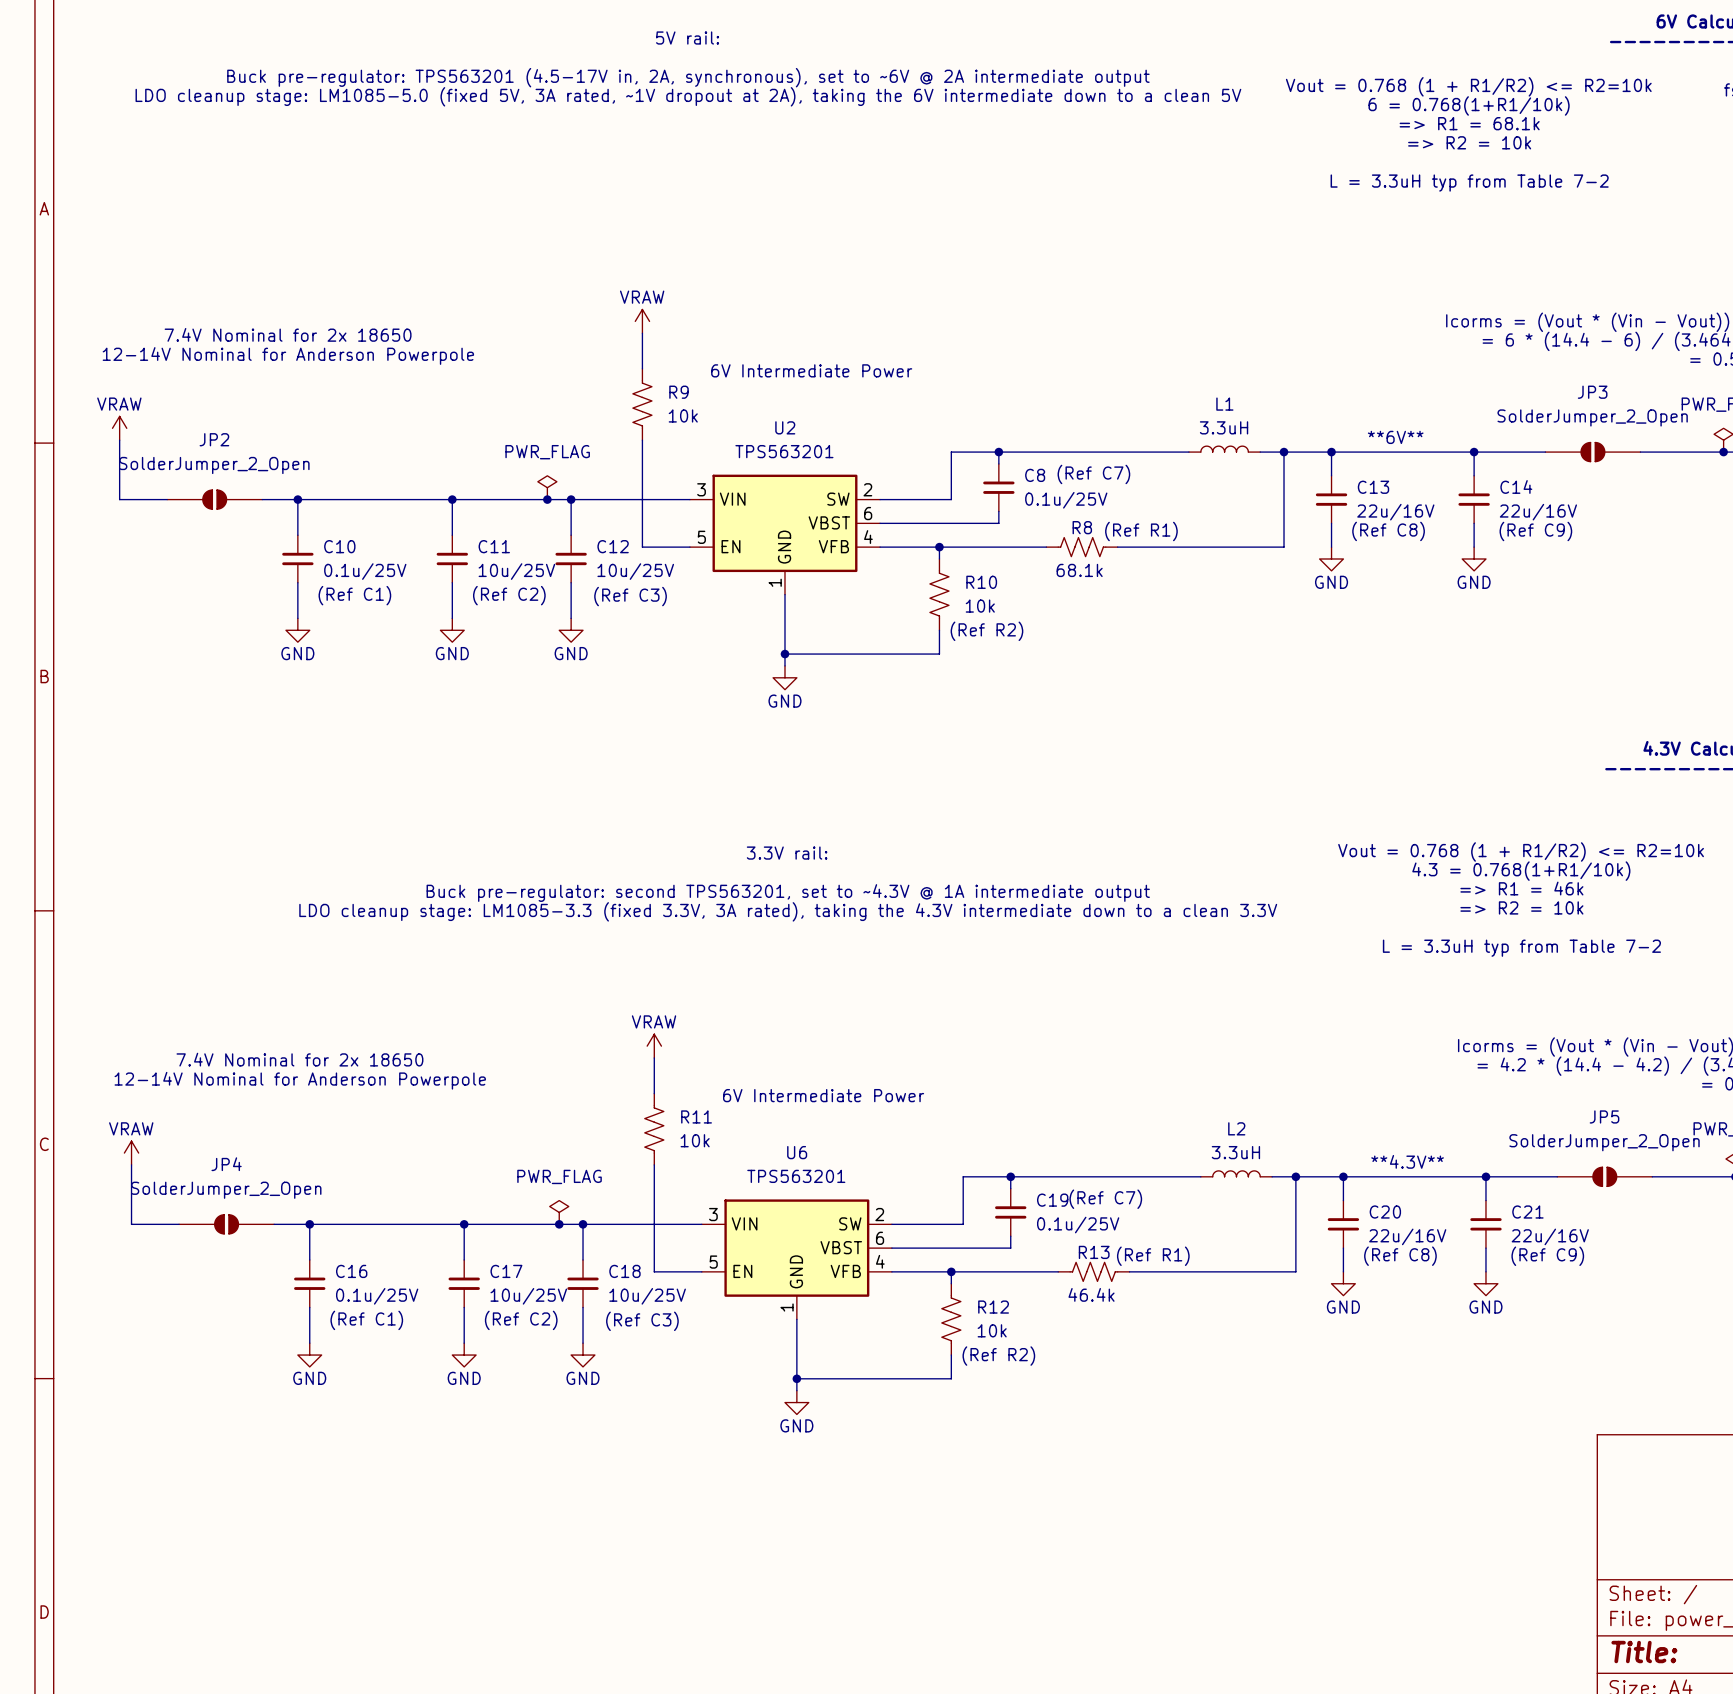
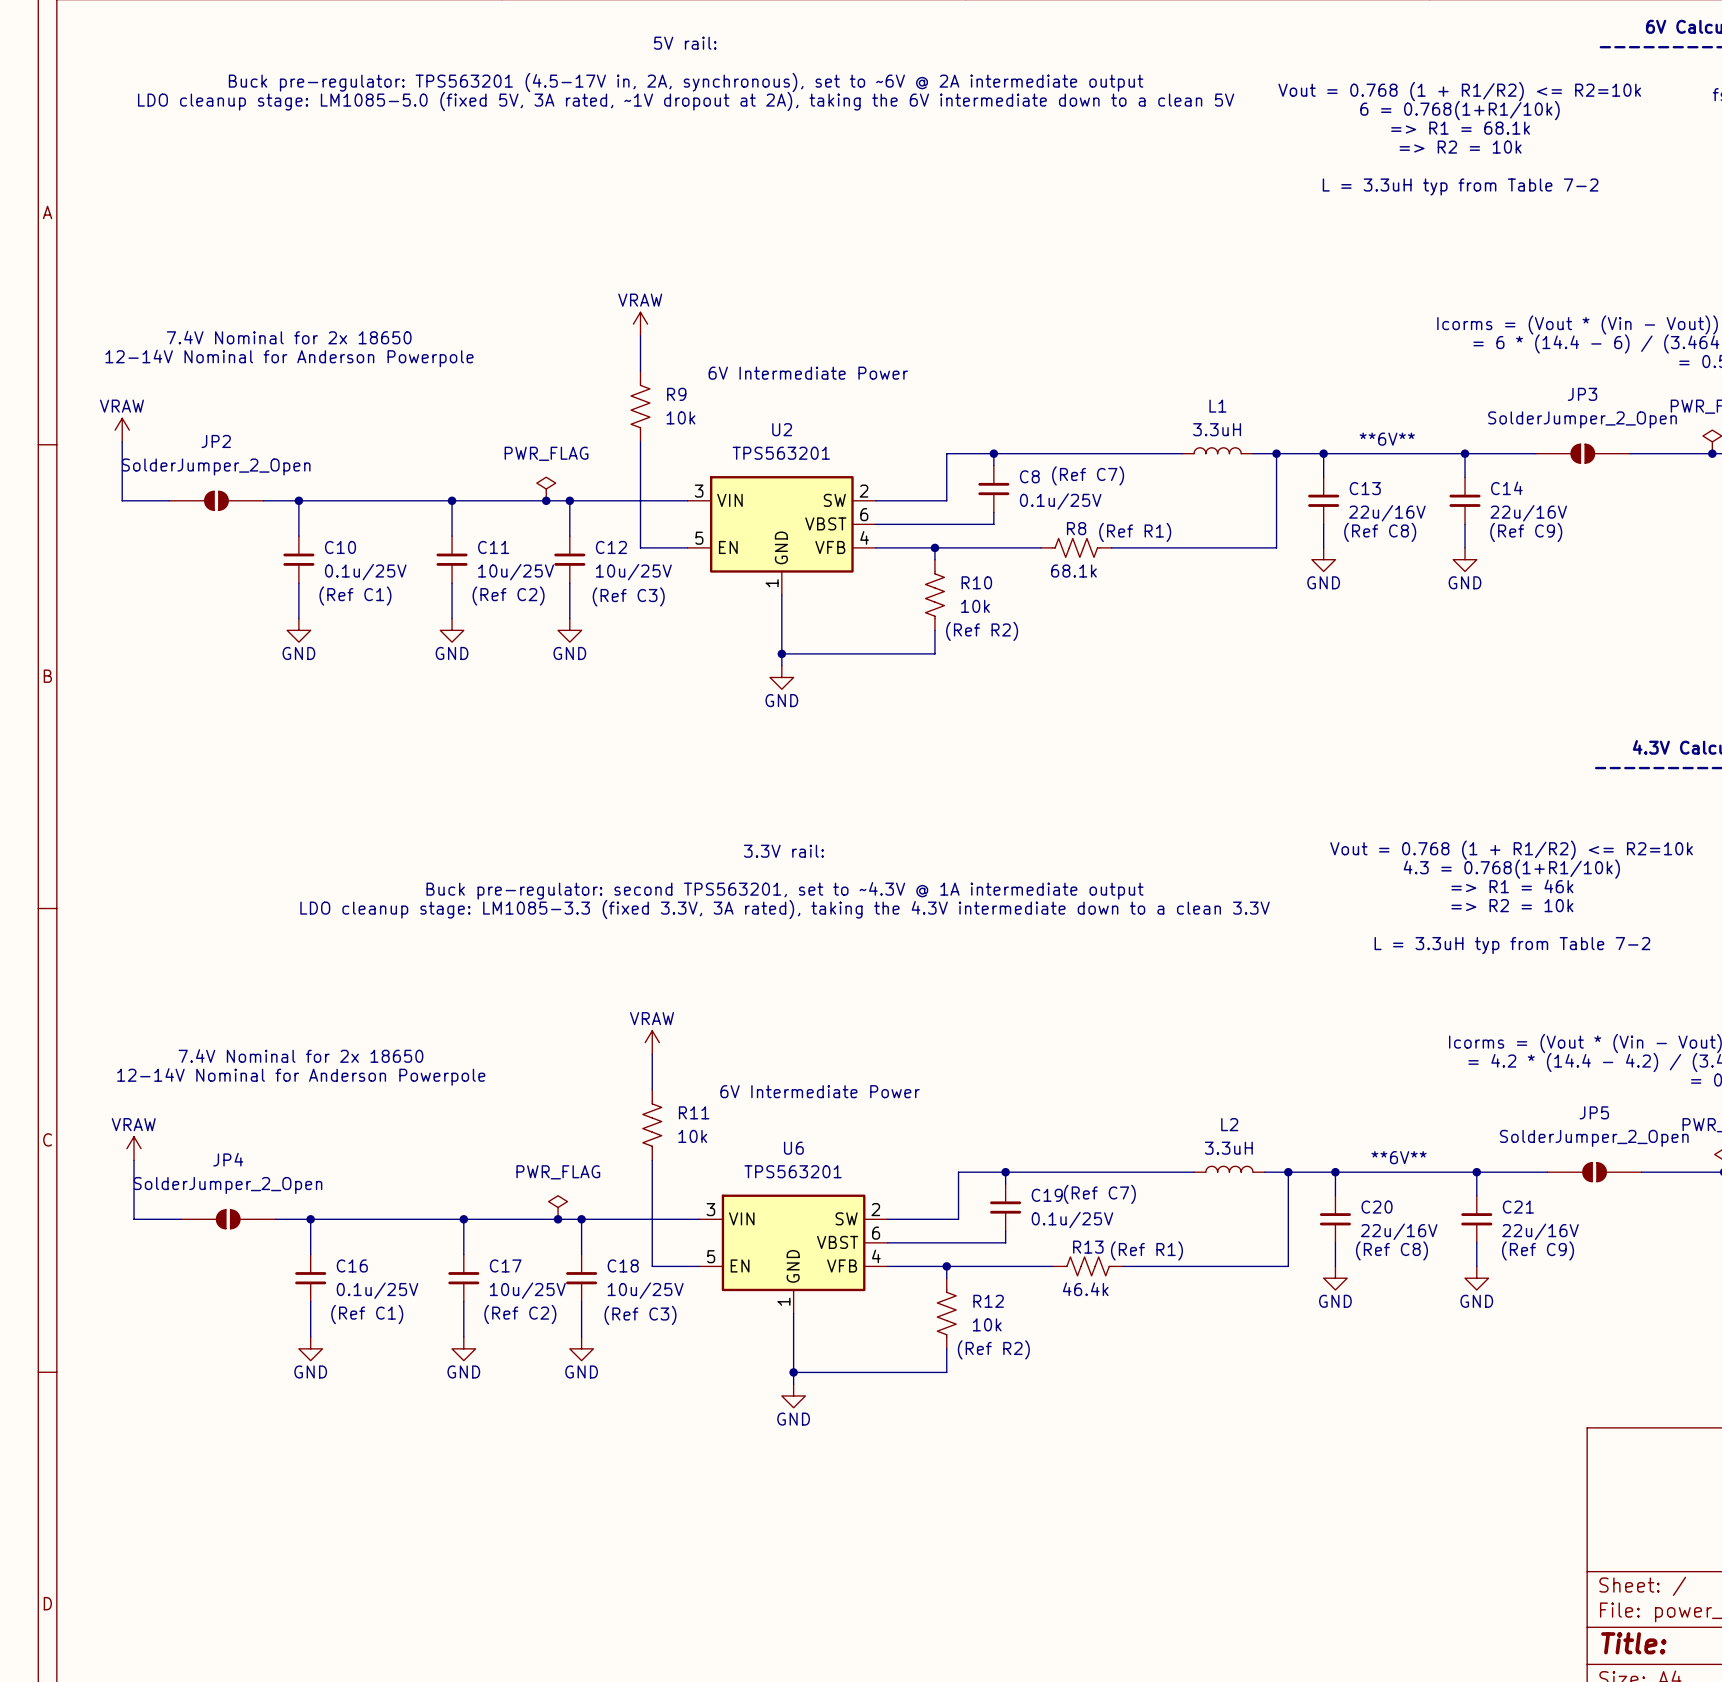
text: **4.3V** (1407, 1161) -> **6V** (1399, 1157)

